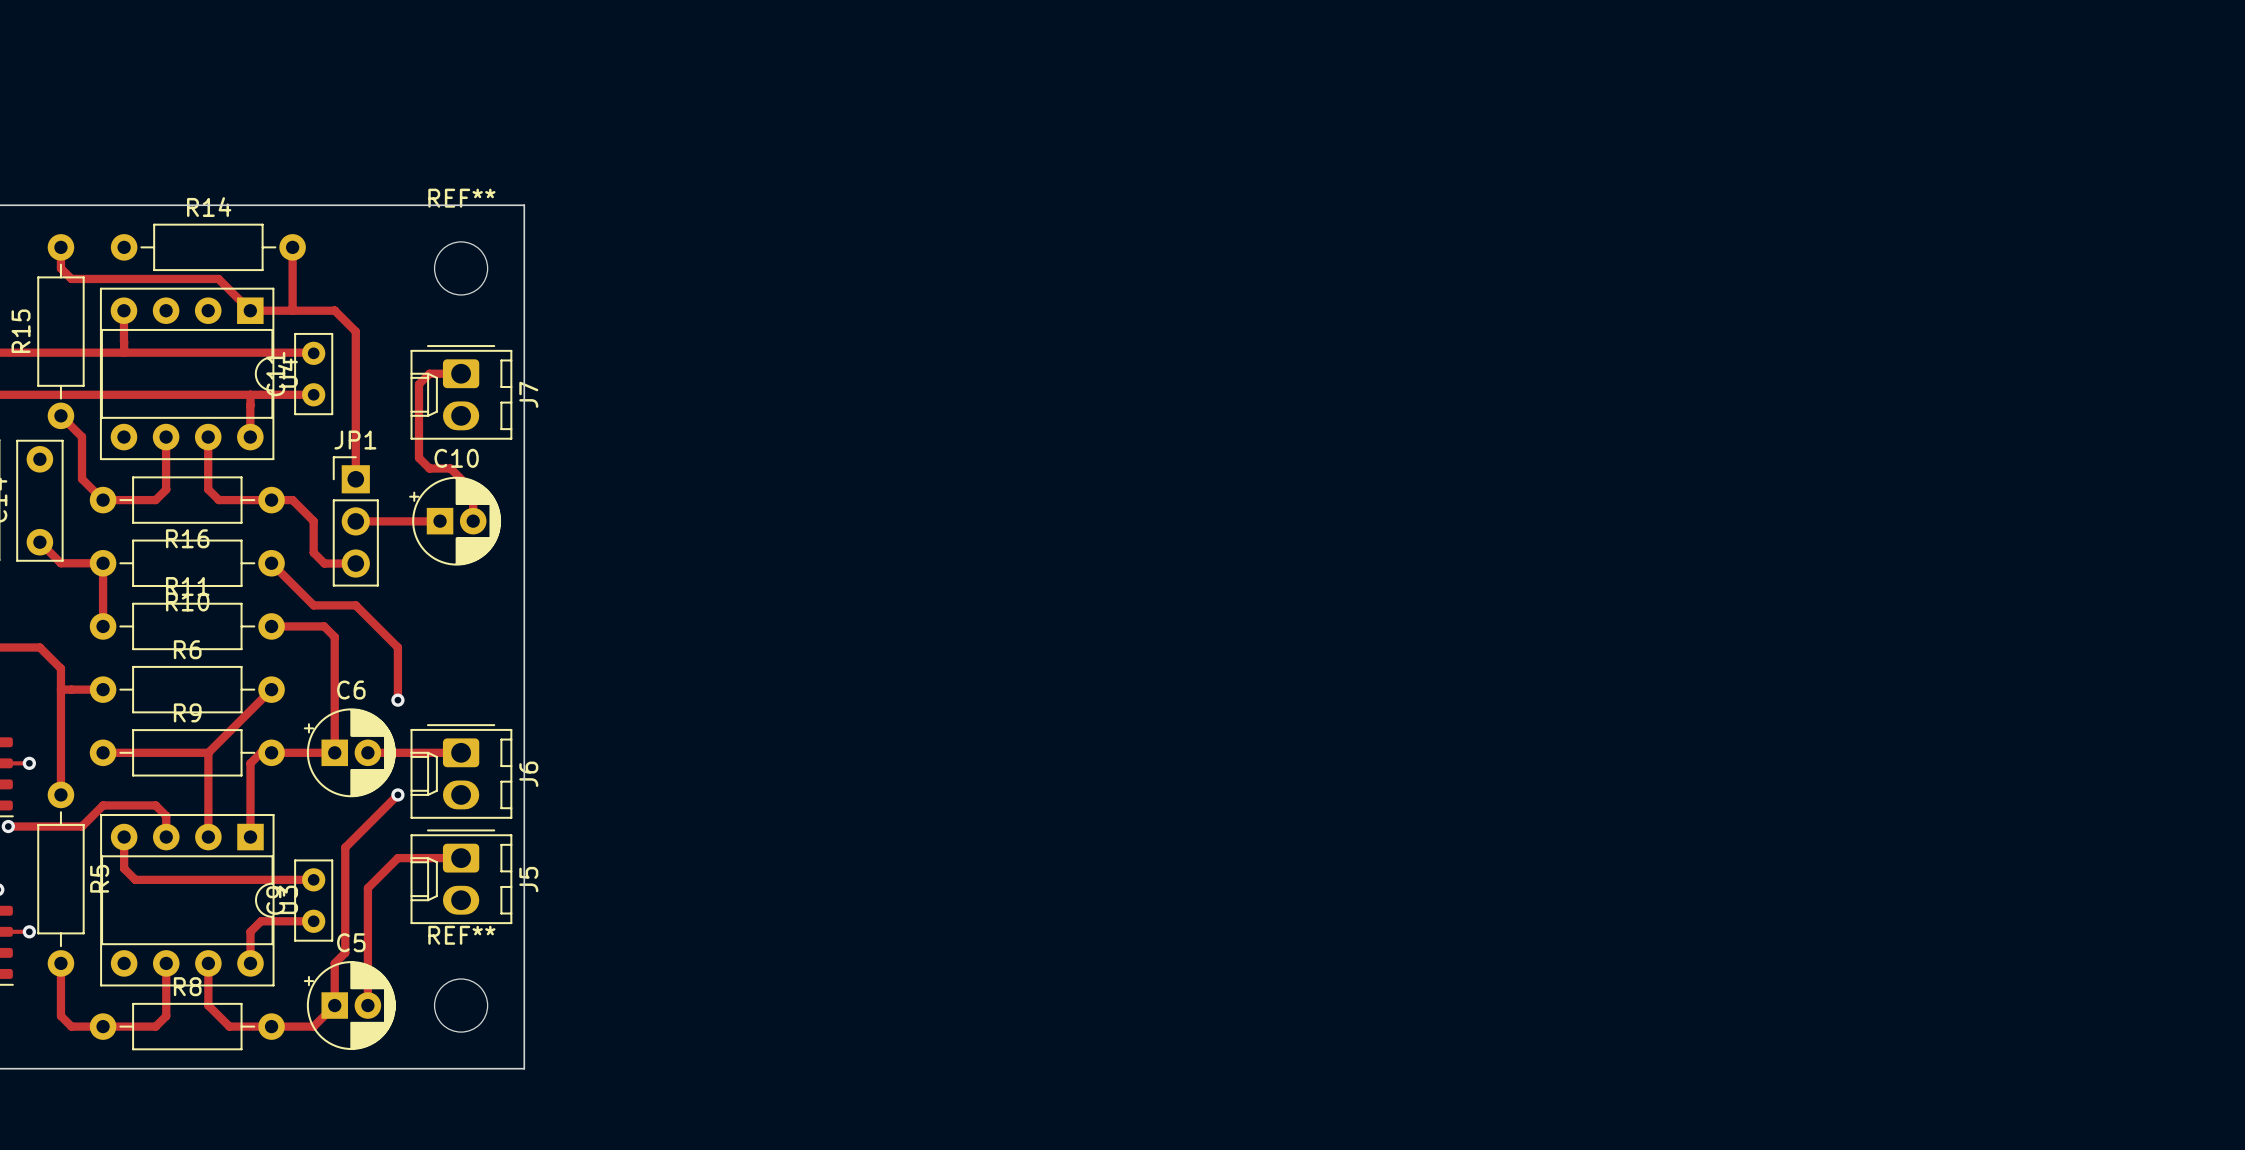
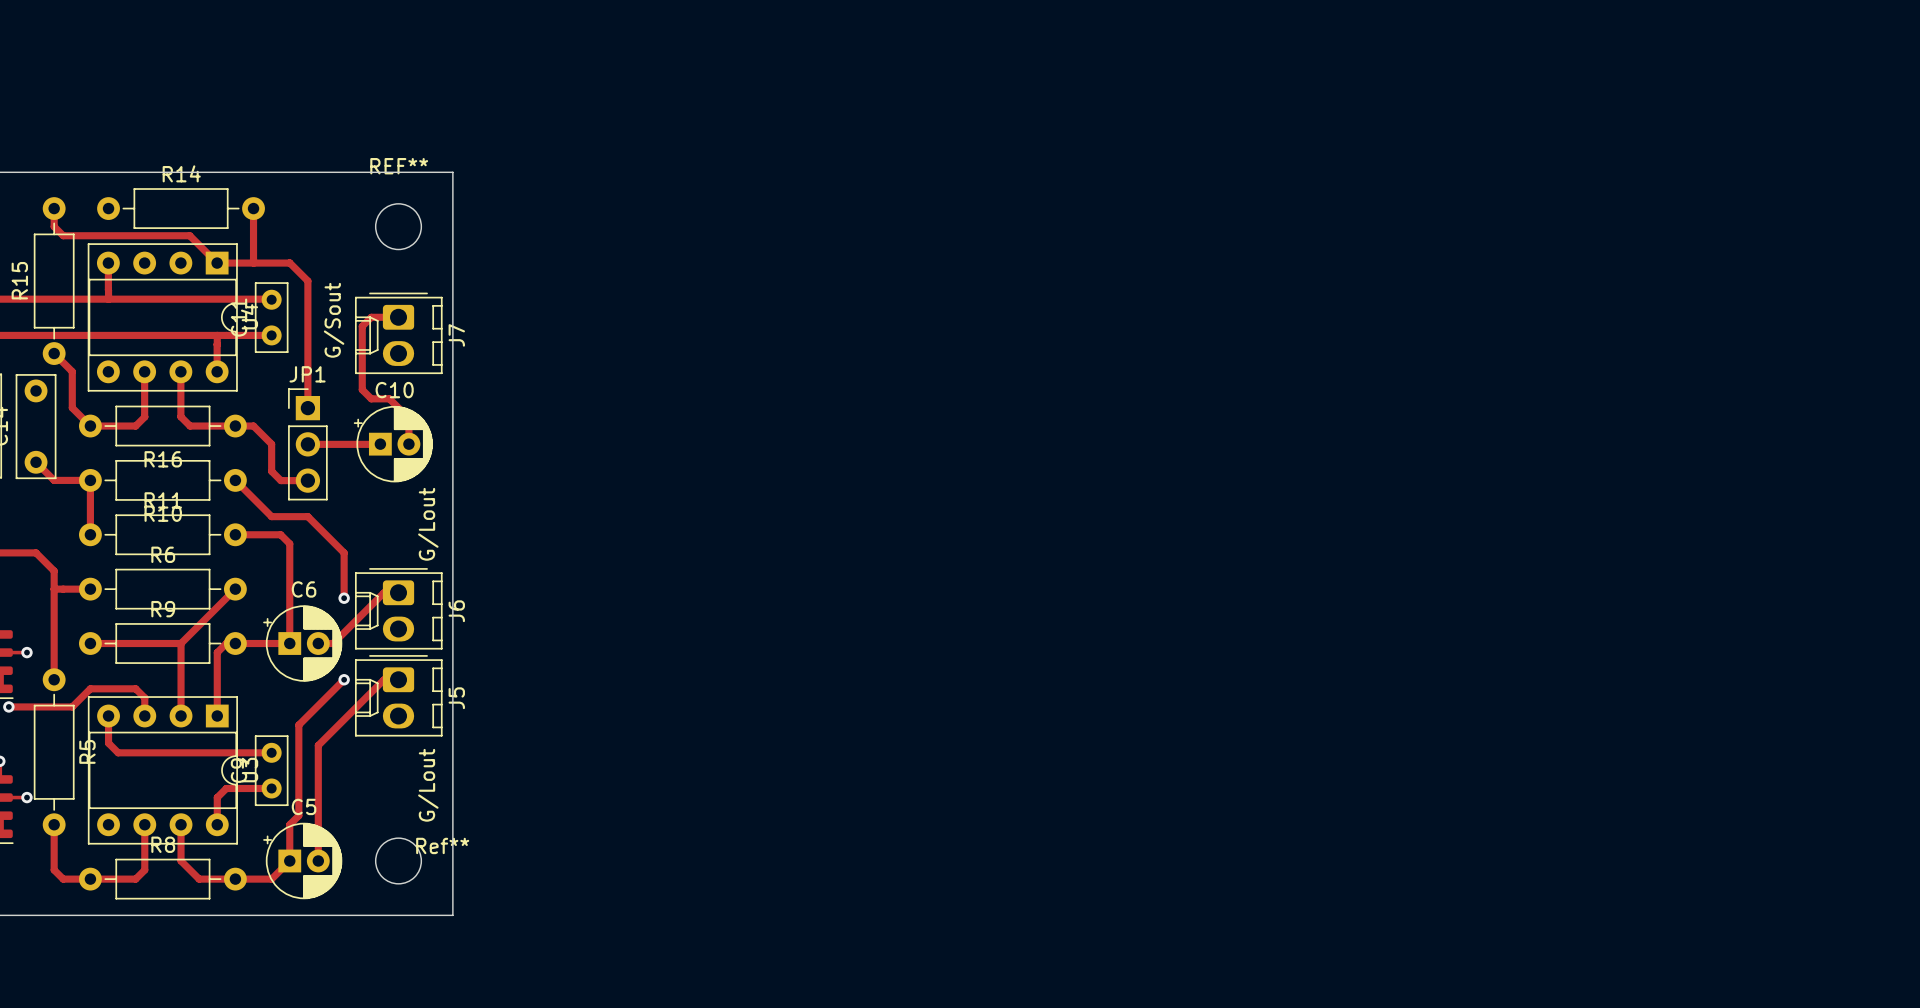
text: none -> G/Sout (334, 320)
text: none -> G/Lout (428, 524)
track: (385, 752) (461, 752) -> (333, 643) (384, 592) (398, 592)
J6 position: (461, 771) -> (398, 608)
track: (461, 858) (397, 858) (367, 888) -> (398, 679) (384, 679) (318, 745) (318, 759)
J5 position: (461, 876) -> (398, 695)
text: none -> G/Lout (428, 785)
REF** name: REF** (461, 935) -> Ref** (442, 845)

